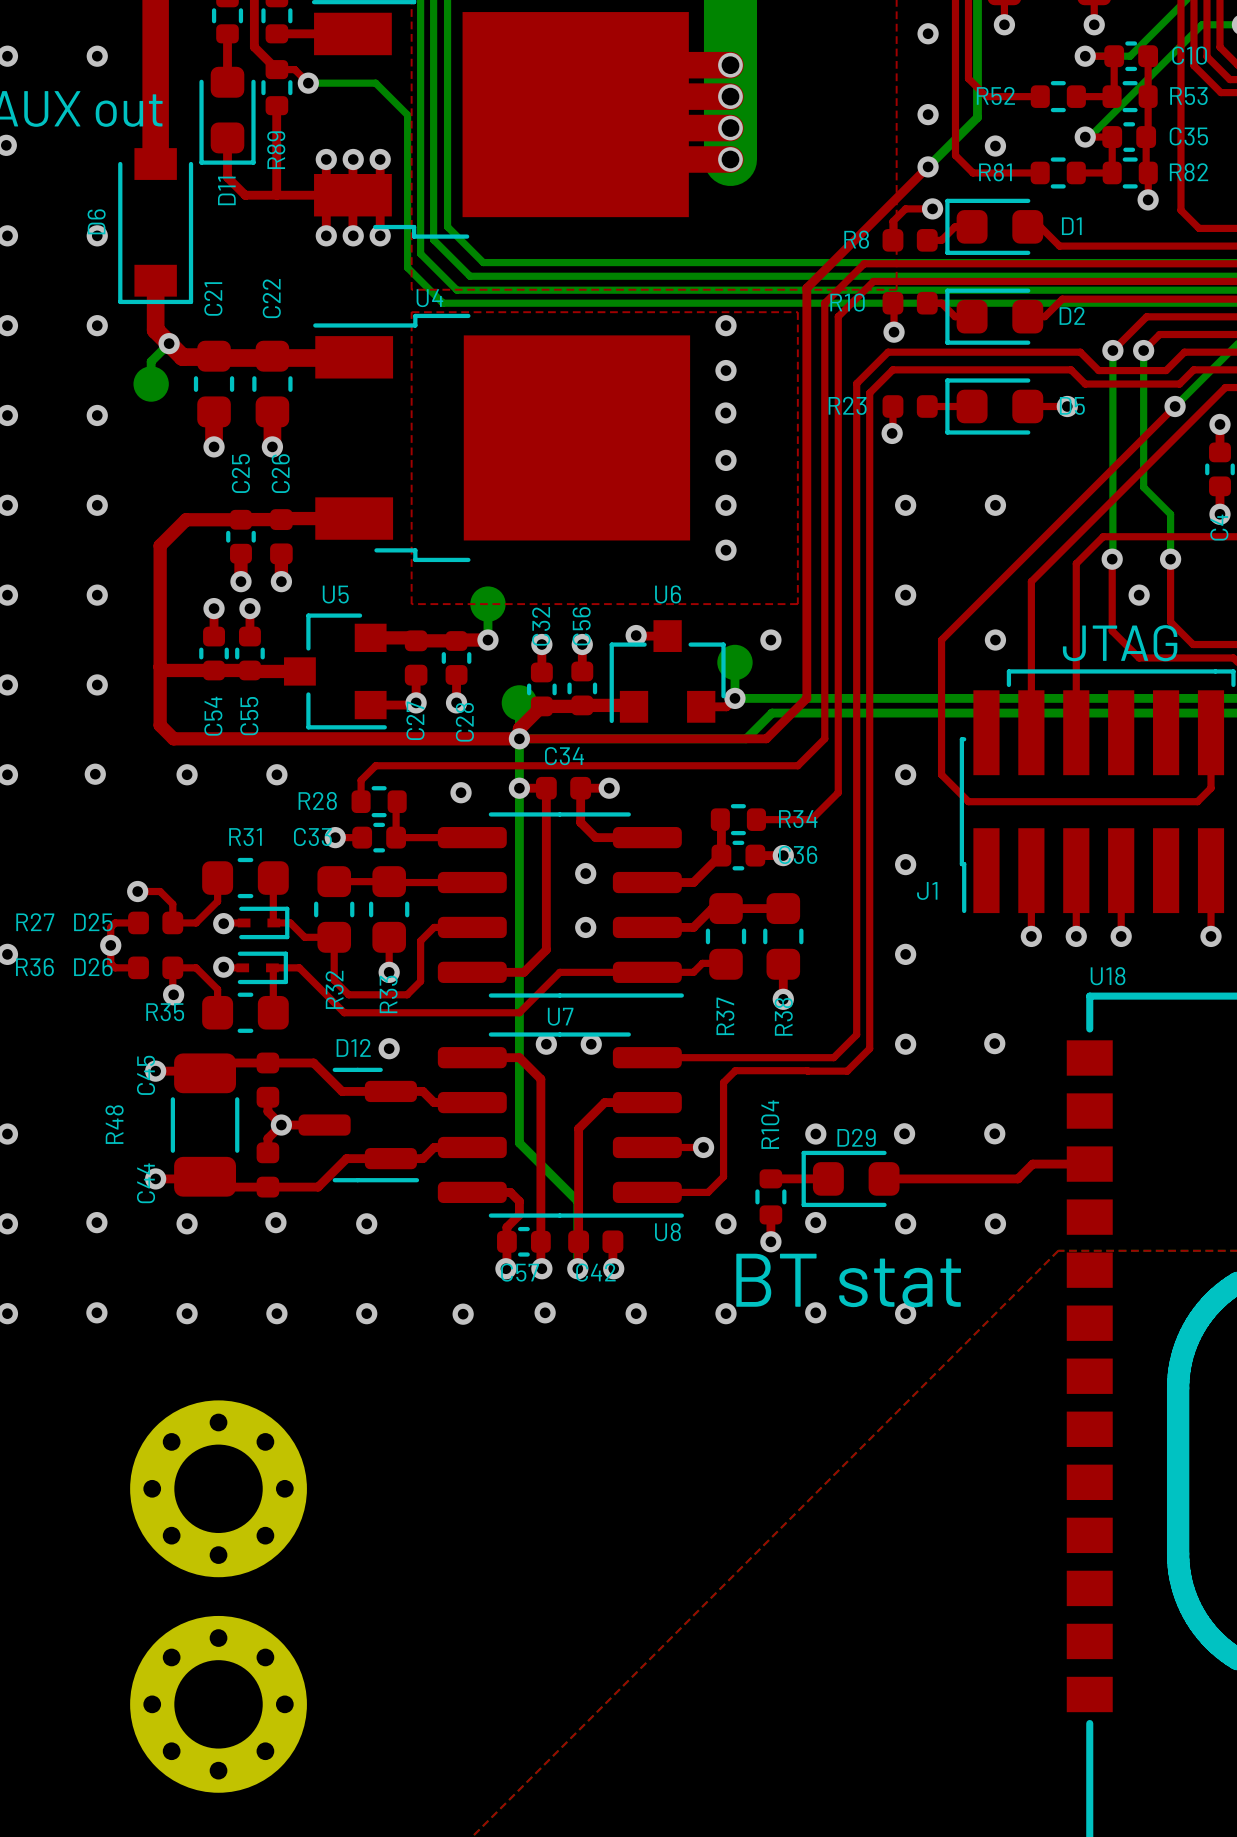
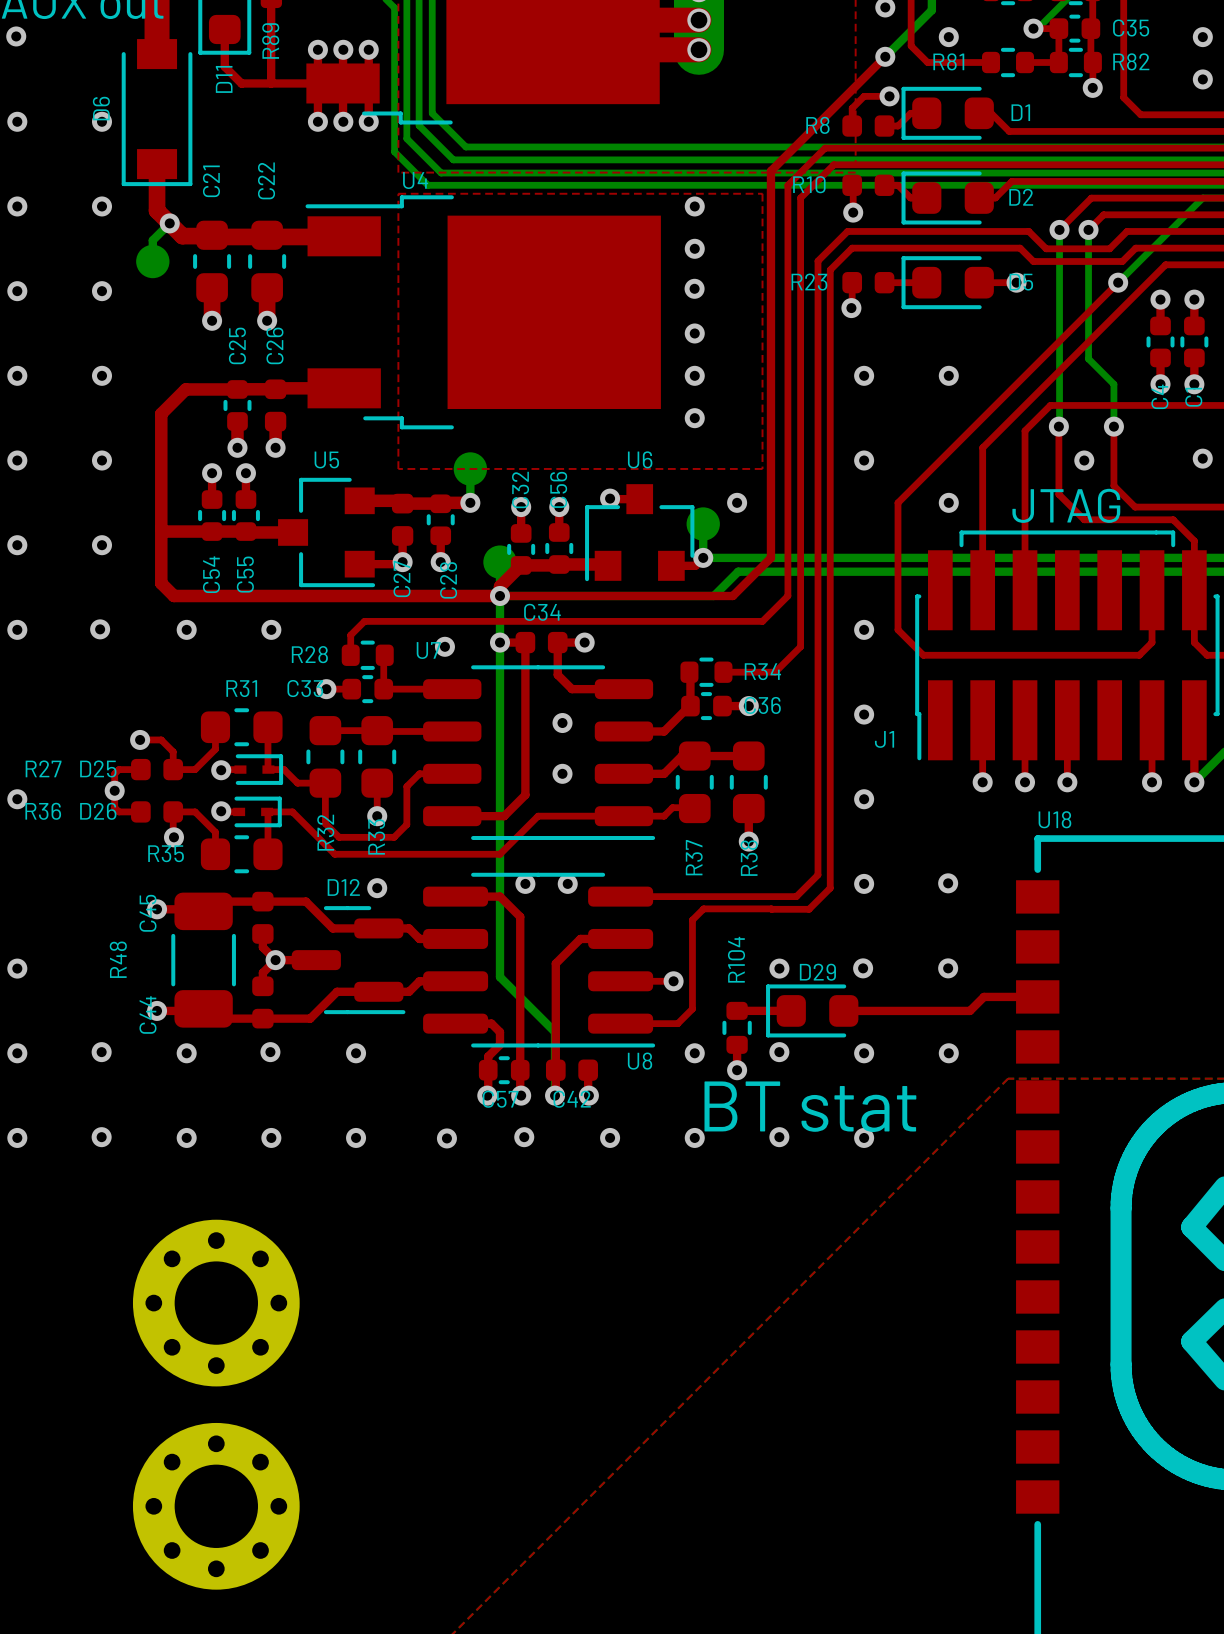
U7 footprint: [437, 812, 684, 998] -> [423, 665, 656, 841]
U7 name position: U7 (560, 1016) -> U7 (428, 650)

